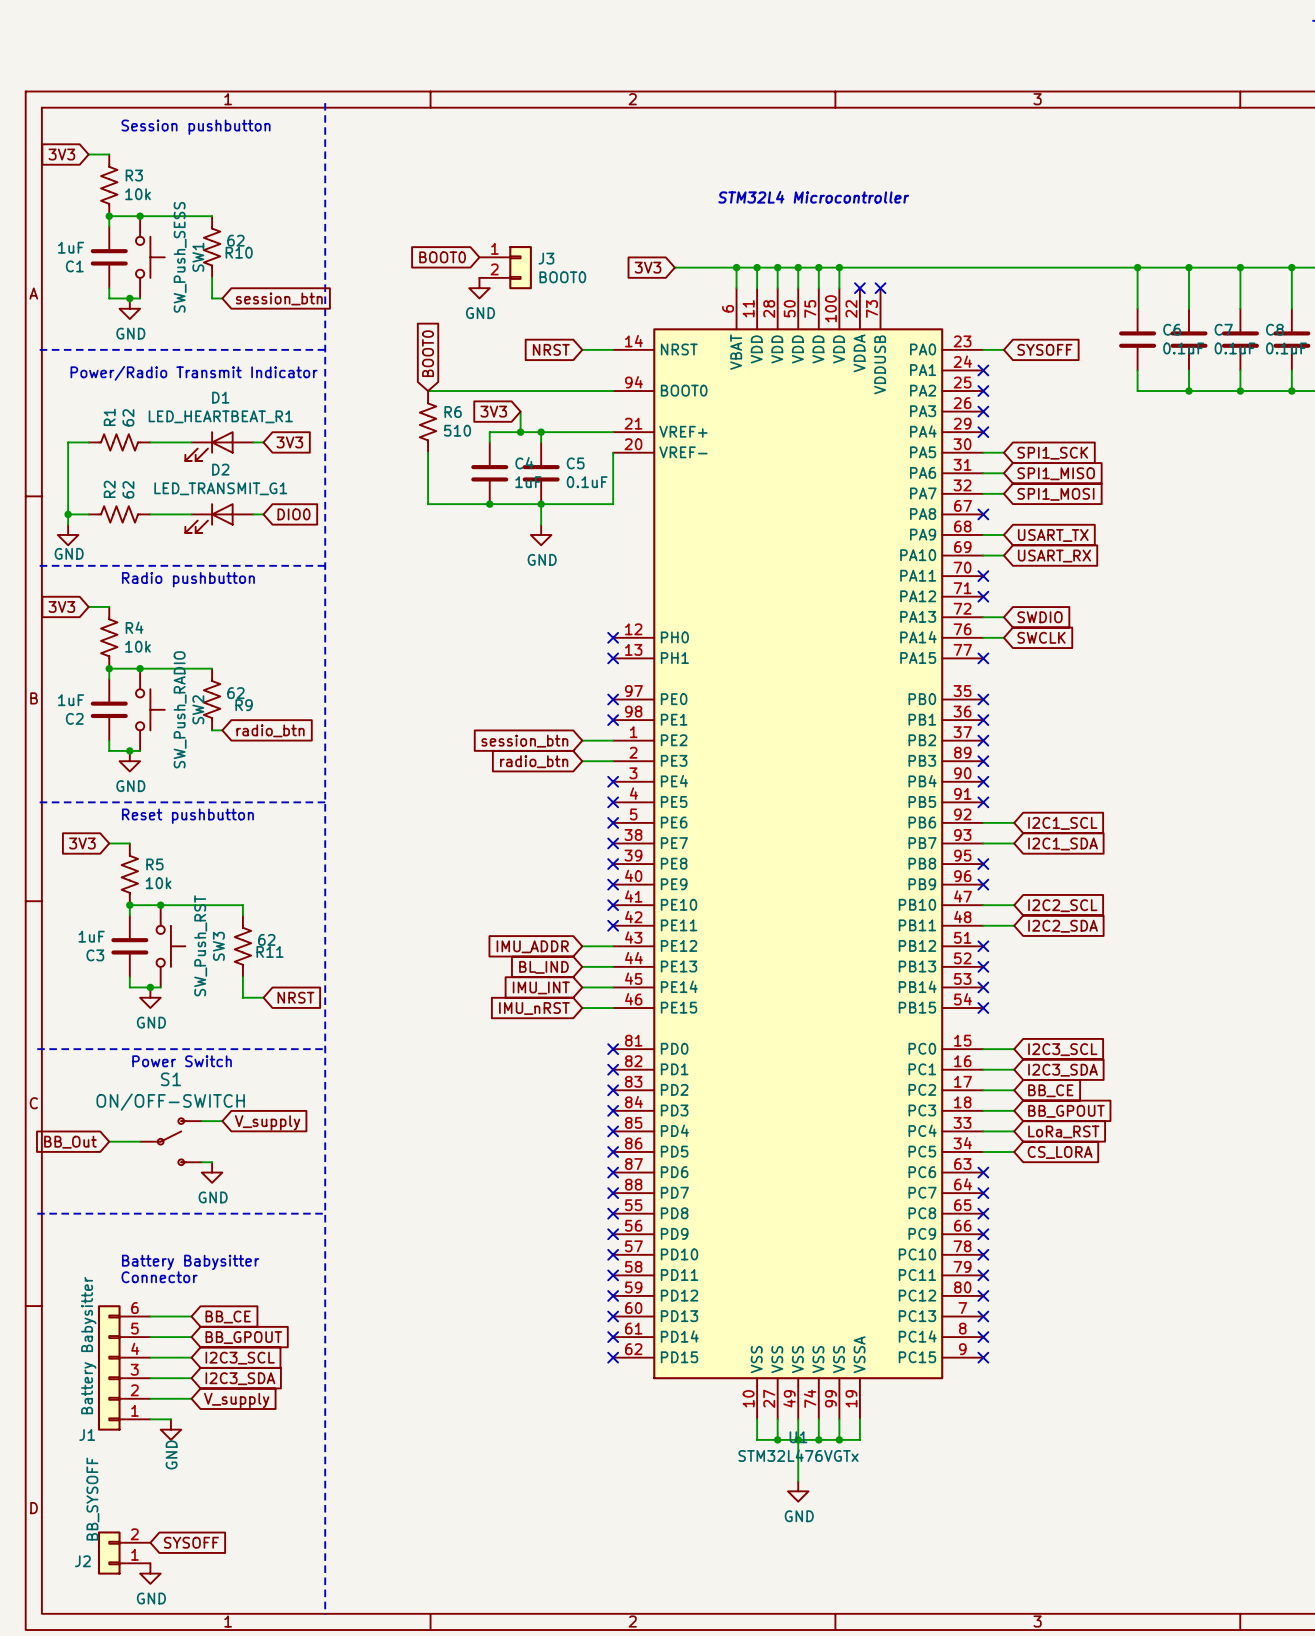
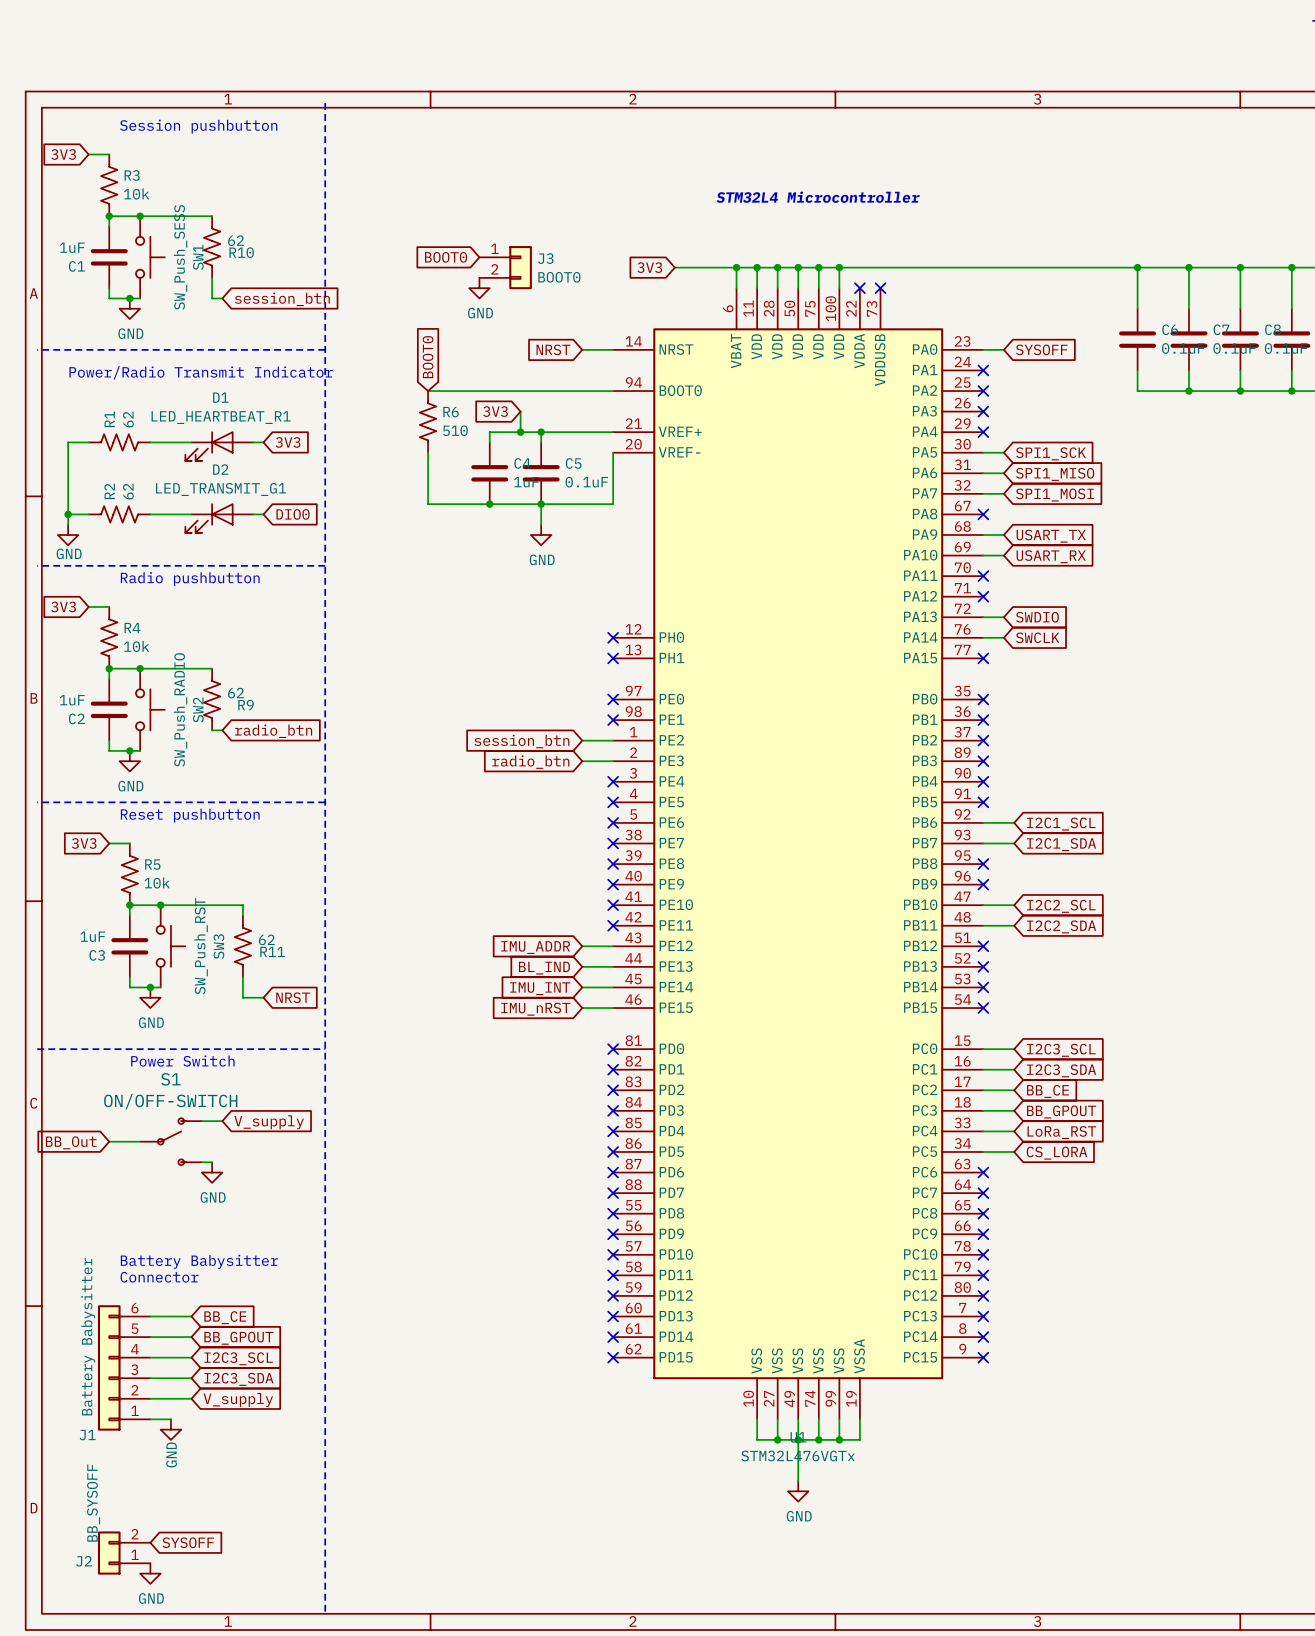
line: (37, 1213) (325, 1213) -> none

